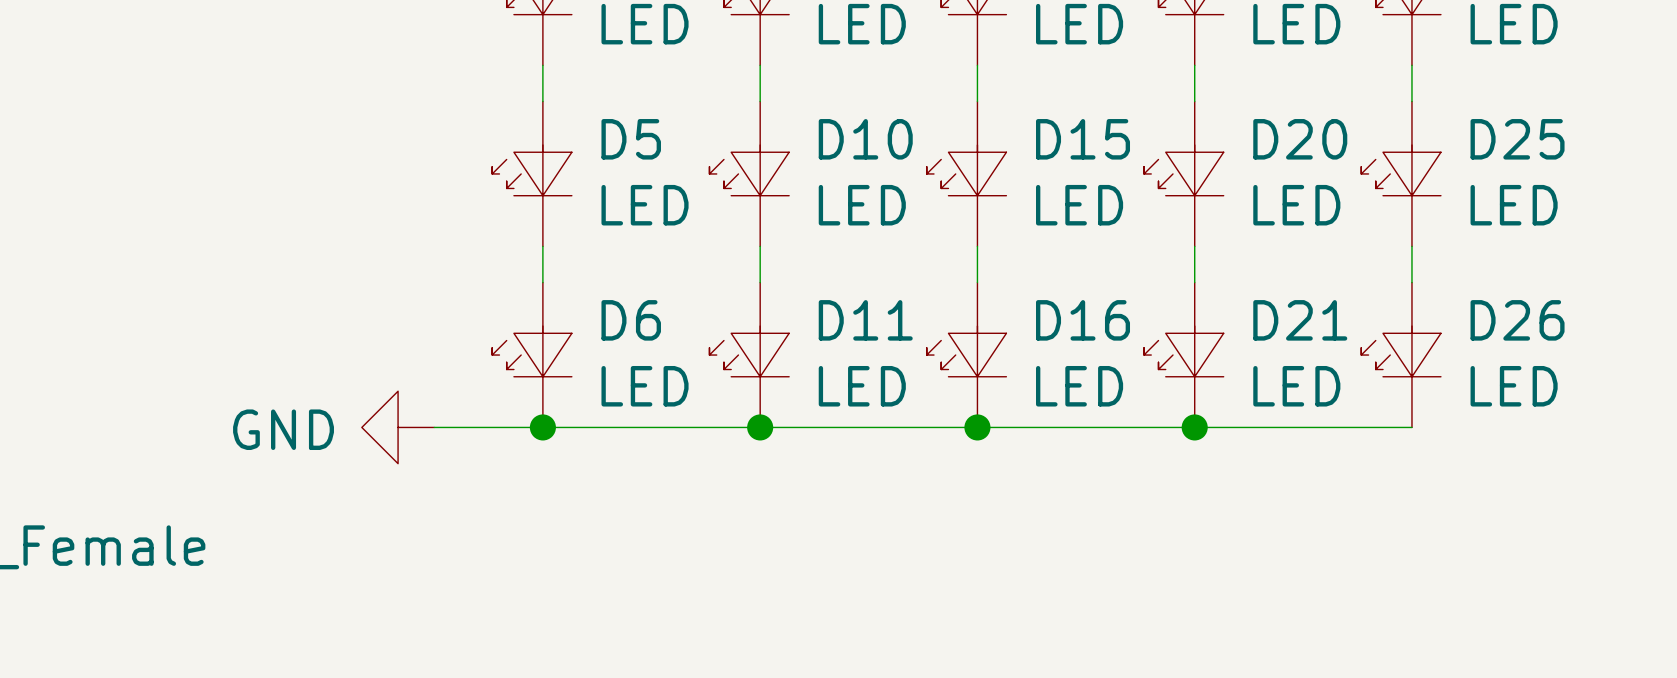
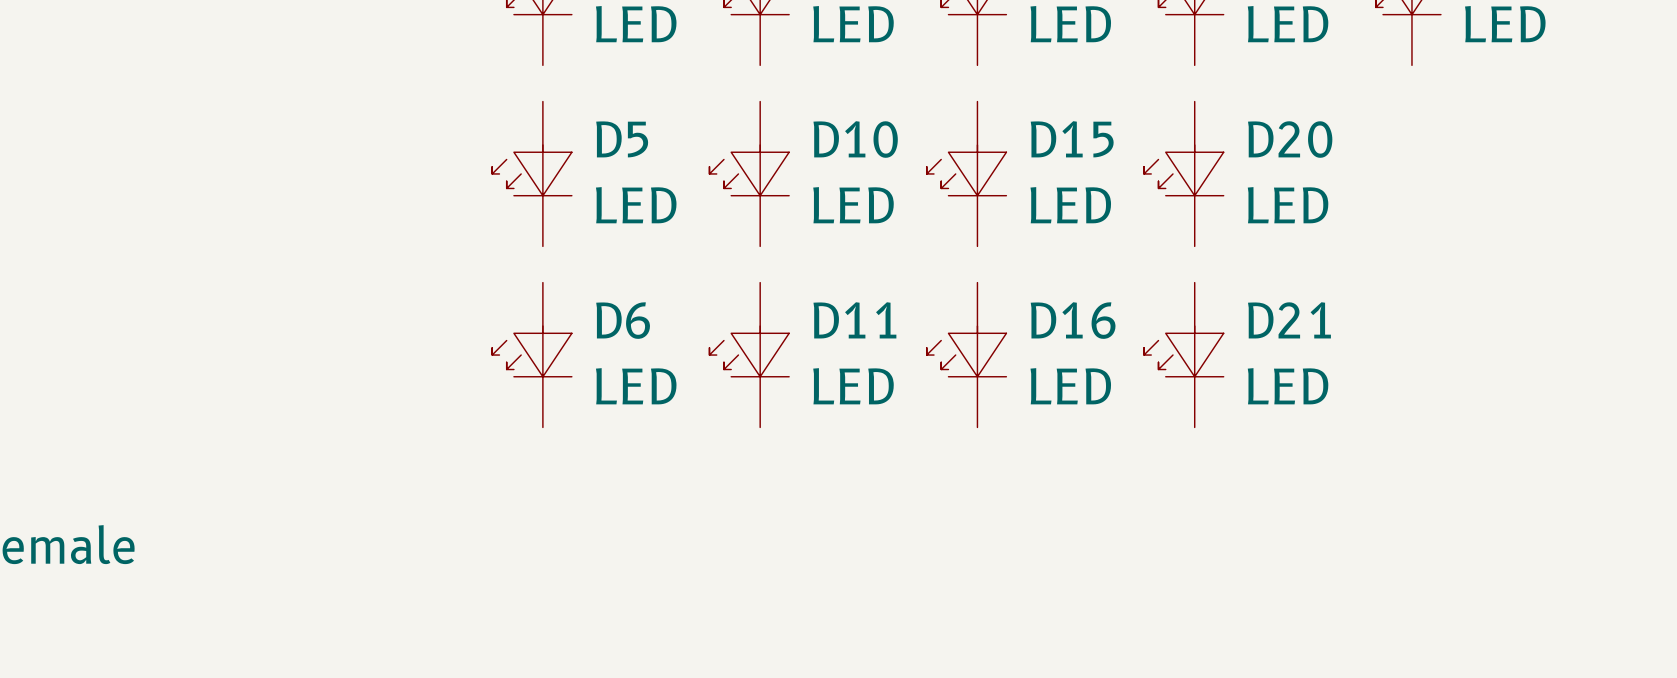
wire: (542, 65) (542, 101) -> none
wire: (760, 65) (760, 101) -> none
wire: (977, 65) (977, 101) -> none
wire: (1194, 65) (1194, 101) -> none
wire: (1411, 65) (1411, 101) -> none
D25: LED (1401, 173) -> none
wire: (542, 246) (542, 282) -> none
wire: (760, 246) (760, 282) -> none
wire: (977, 246) (977, 282) -> none
wire: (1194, 246) (1194, 282) -> none
wire: (1411, 246) (1411, 282) -> none
D26: LED (1401, 355) -> none
power symbol: GND (398, 427) -> none
wire: (434, 427) (1411, 427) -> none
junction: (542, 427) -> none
junction: (760, 427) -> none
junction: (977, 427) -> none
junction: (1194, 427) -> none

